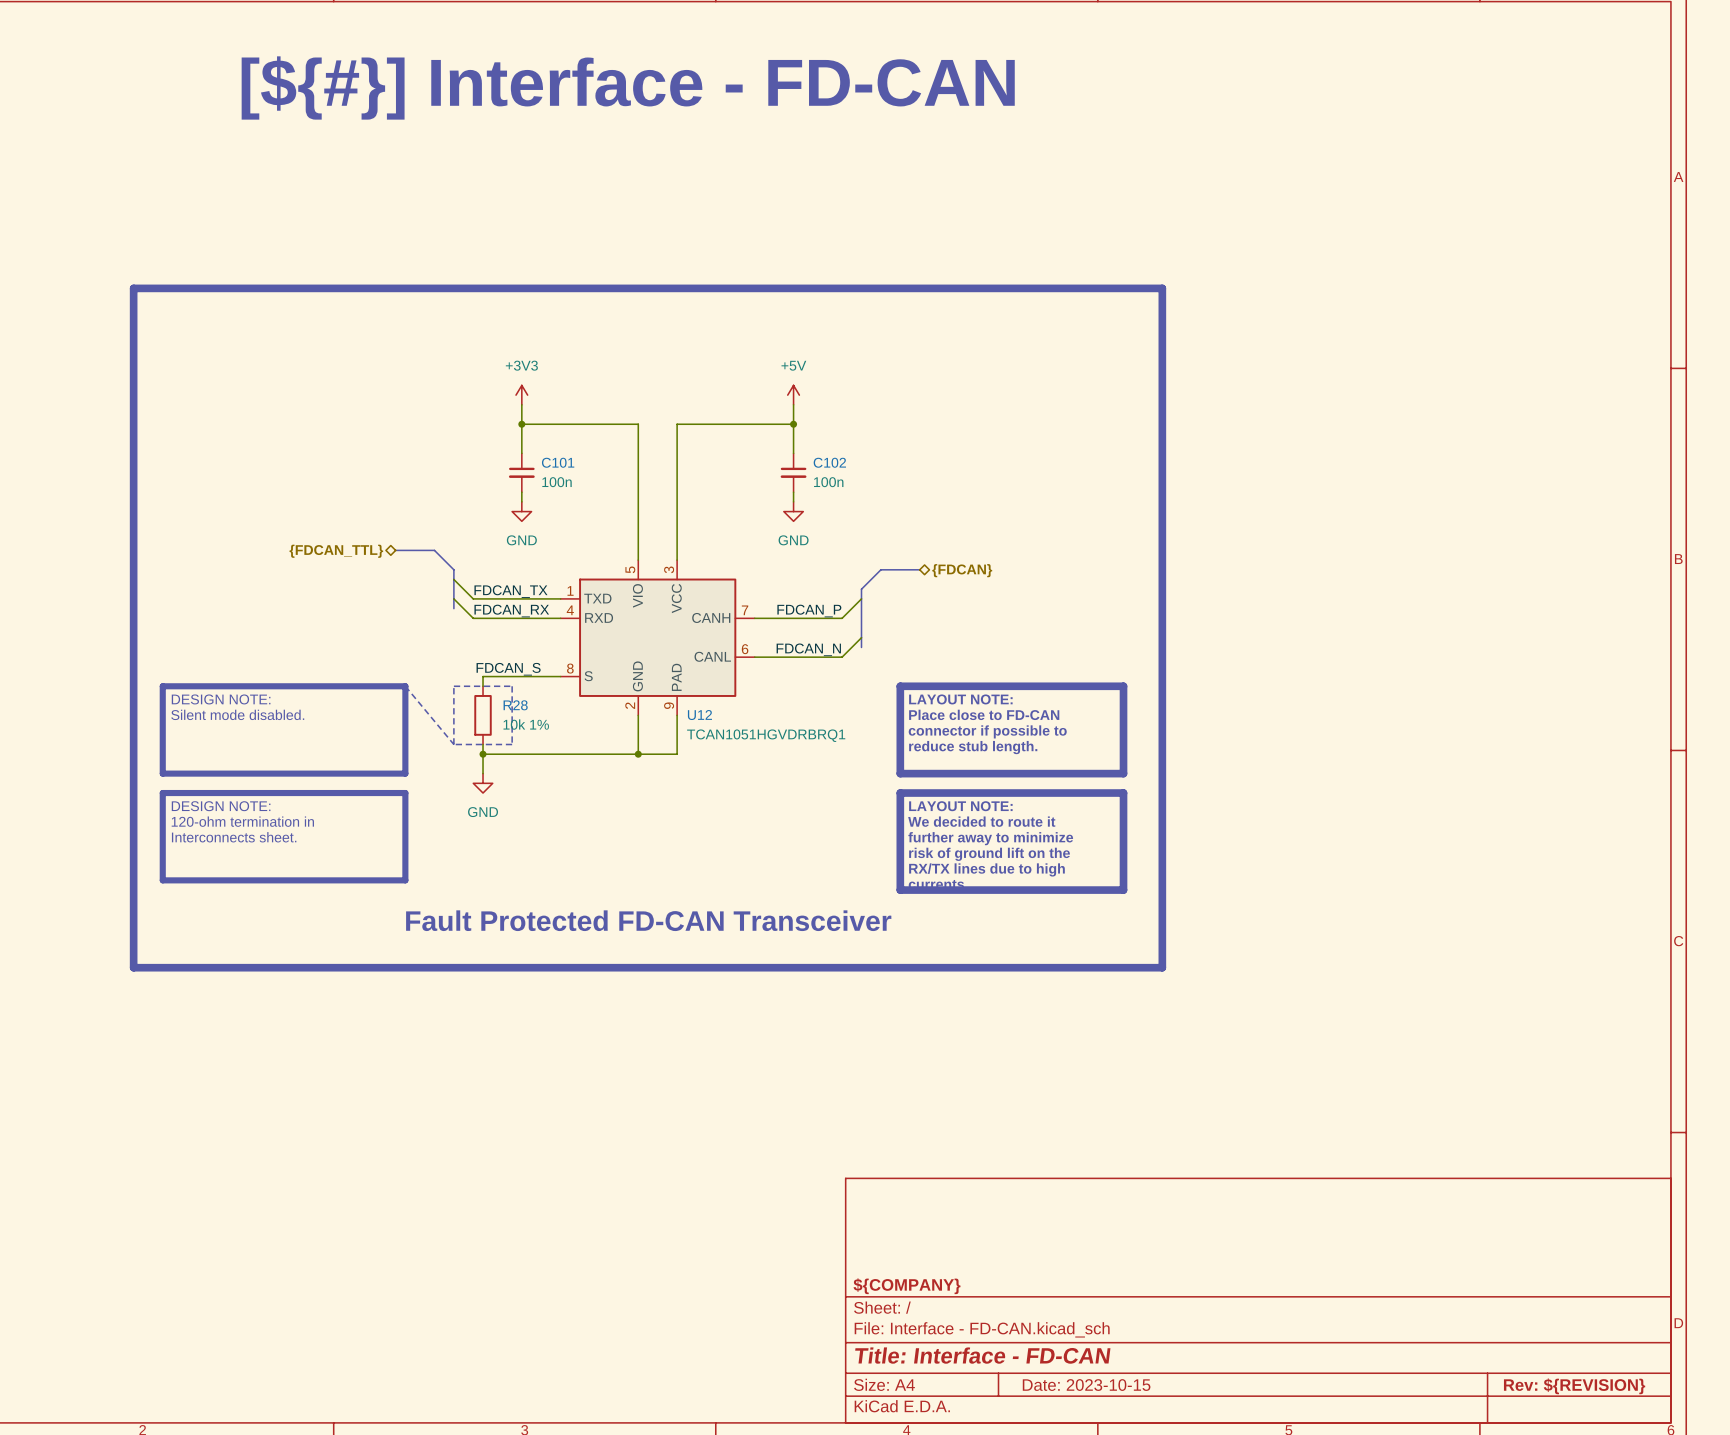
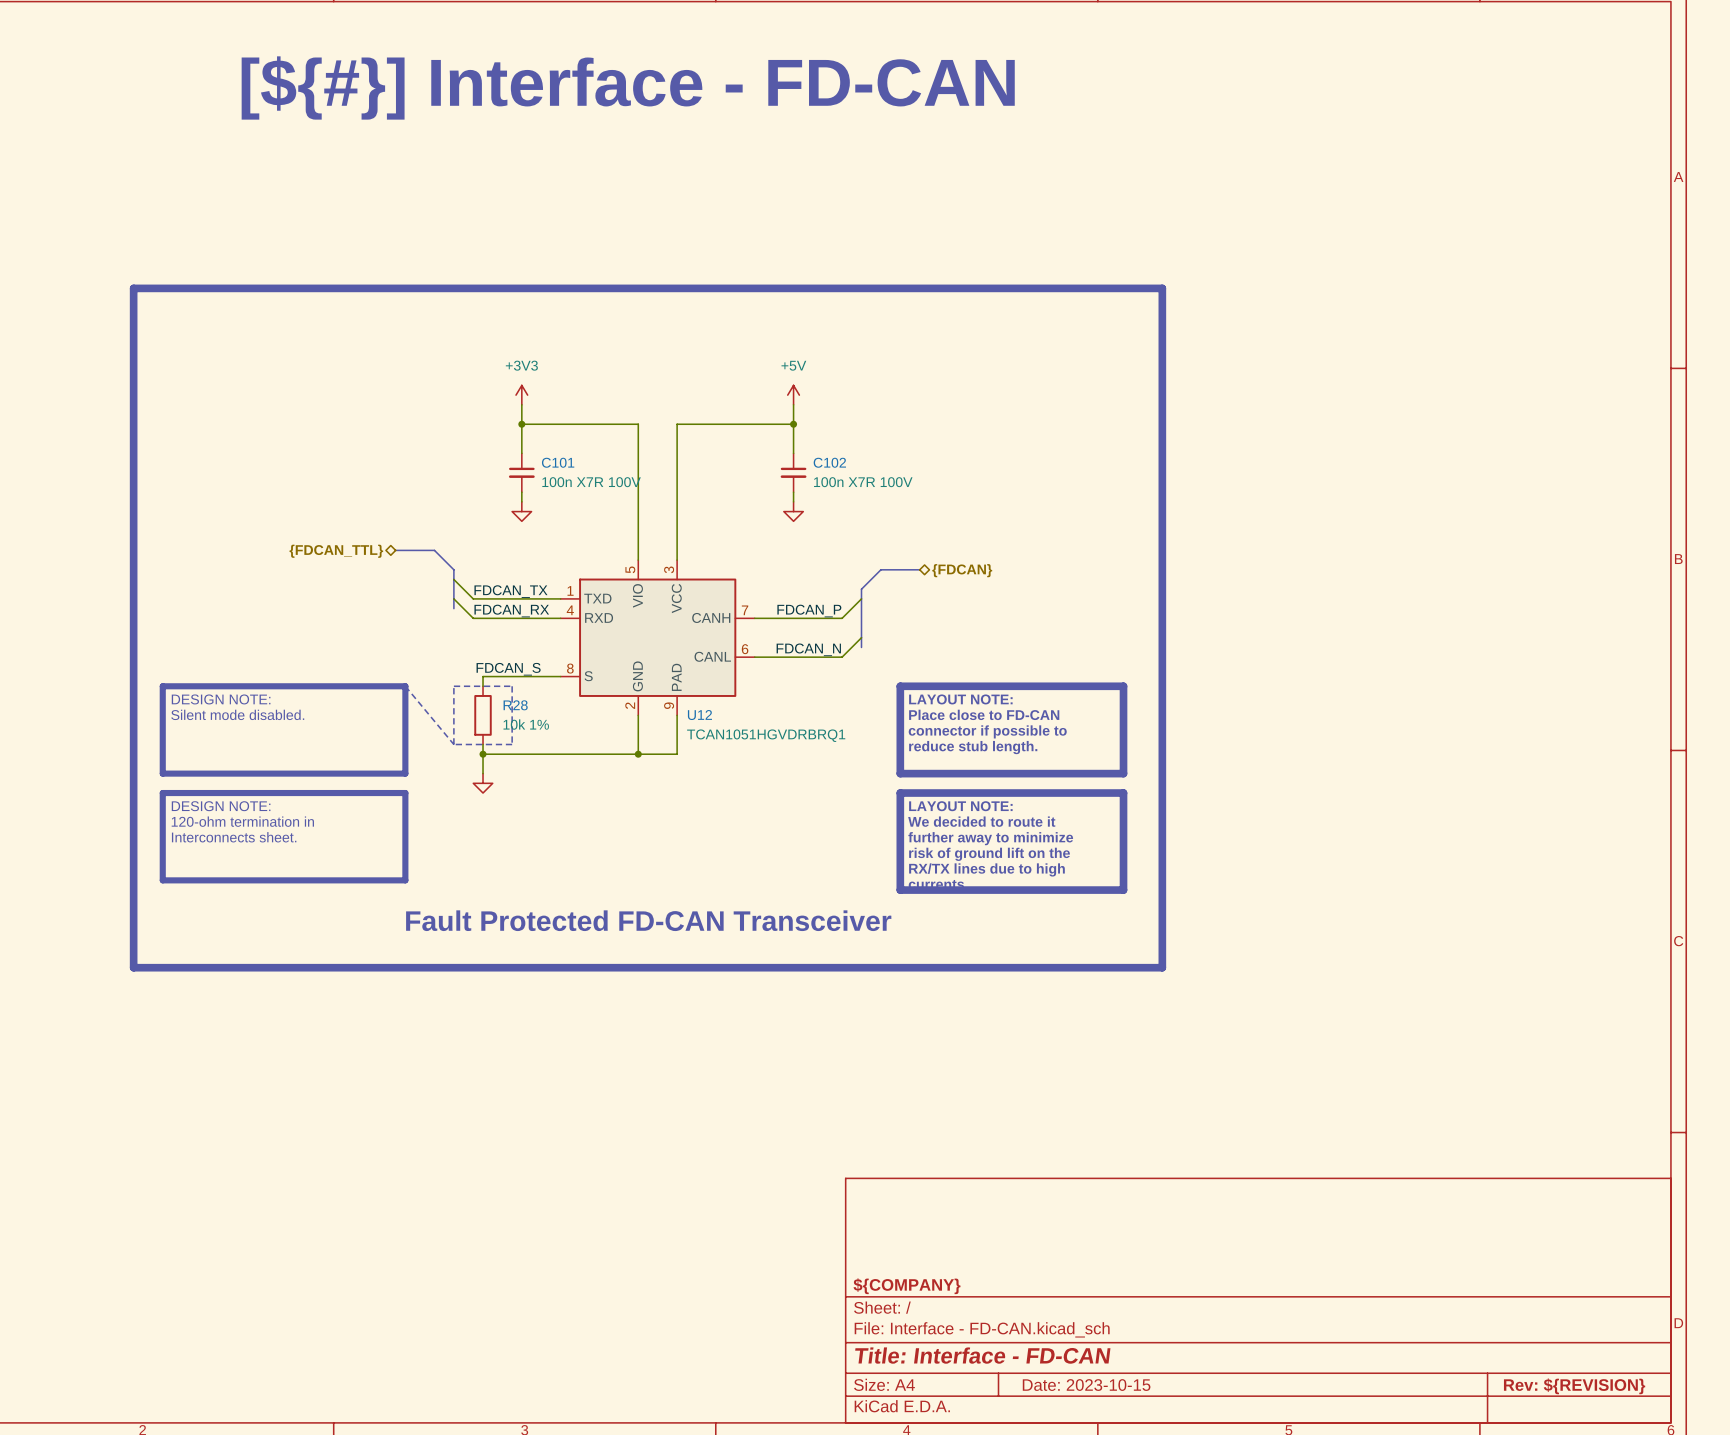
C101 value: 100n (557, 482) -> 100n X7R 100V (591, 482)
C102 value: 100n (828, 482) -> 100n X7R 100V (863, 482)
power symbol text: GND (521, 540) -> none
power symbol text: GND (793, 540) -> none
power symbol text: GND (483, 812) -> none

